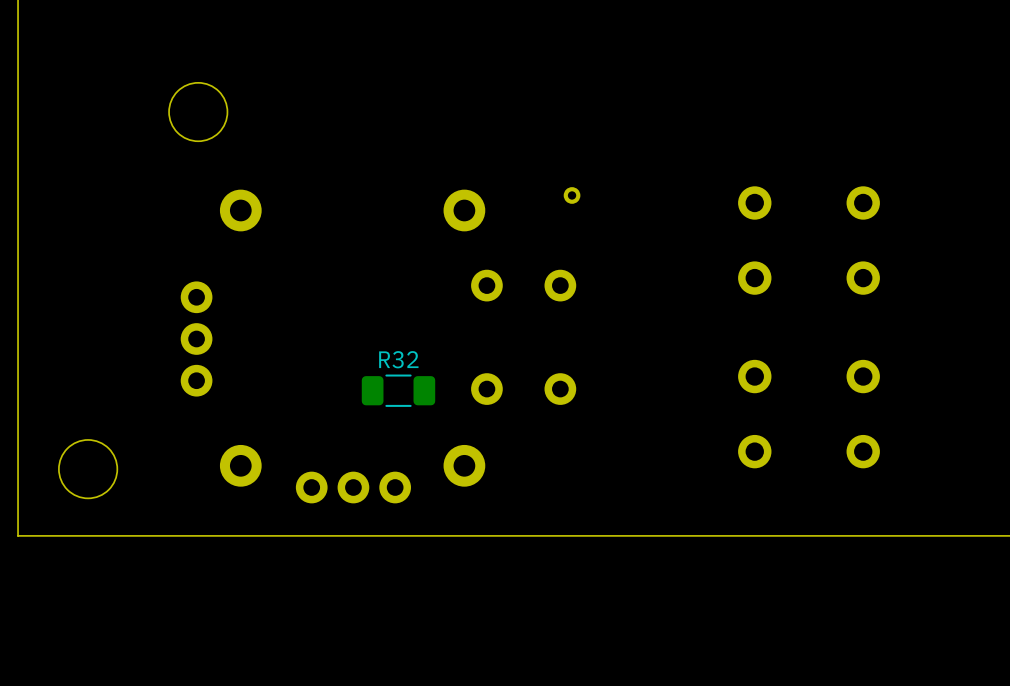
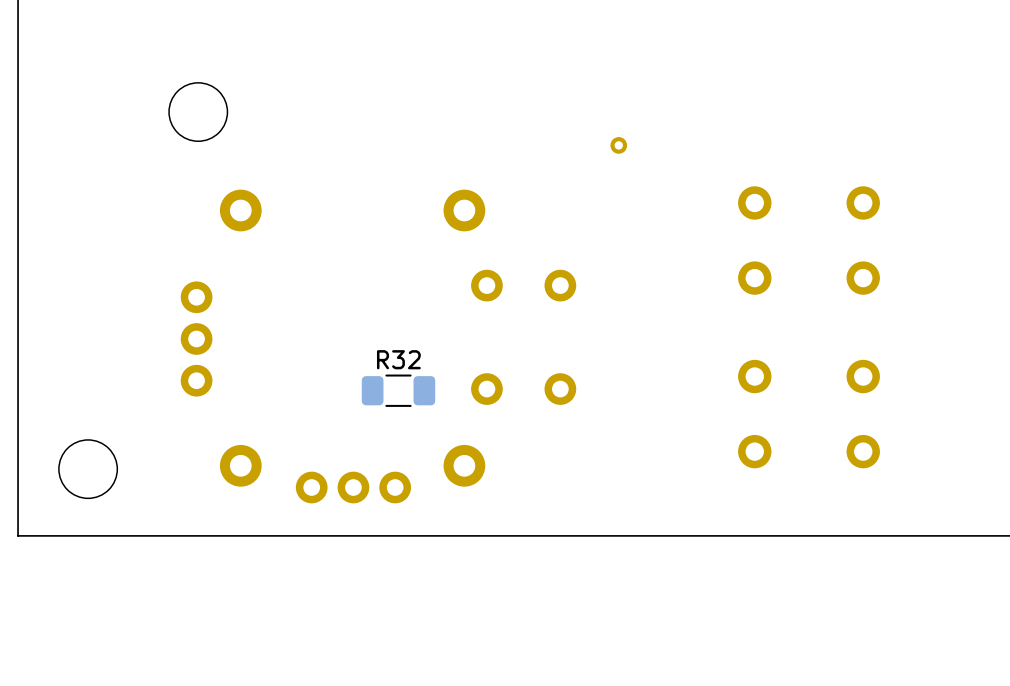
part position: (572, 195) -> (618, 145)

